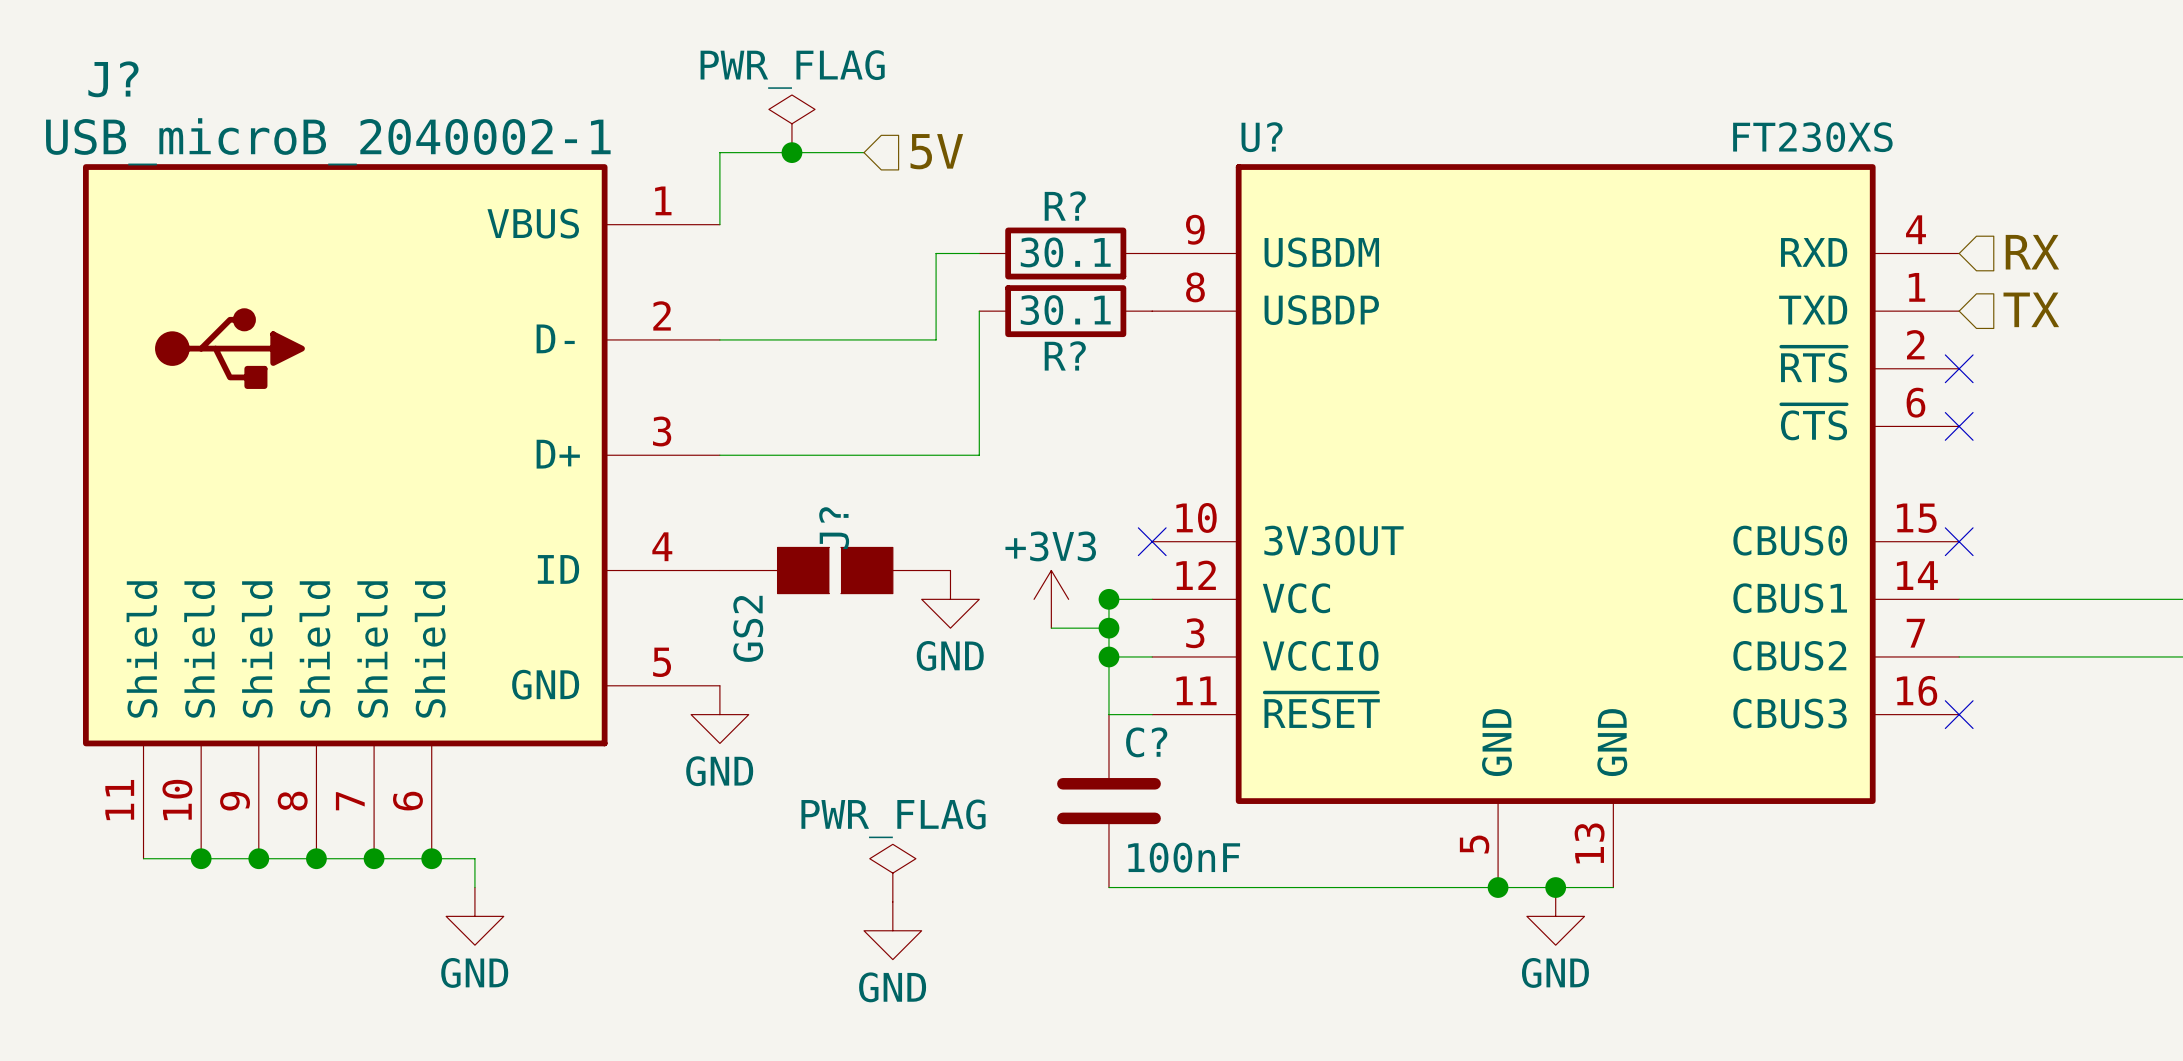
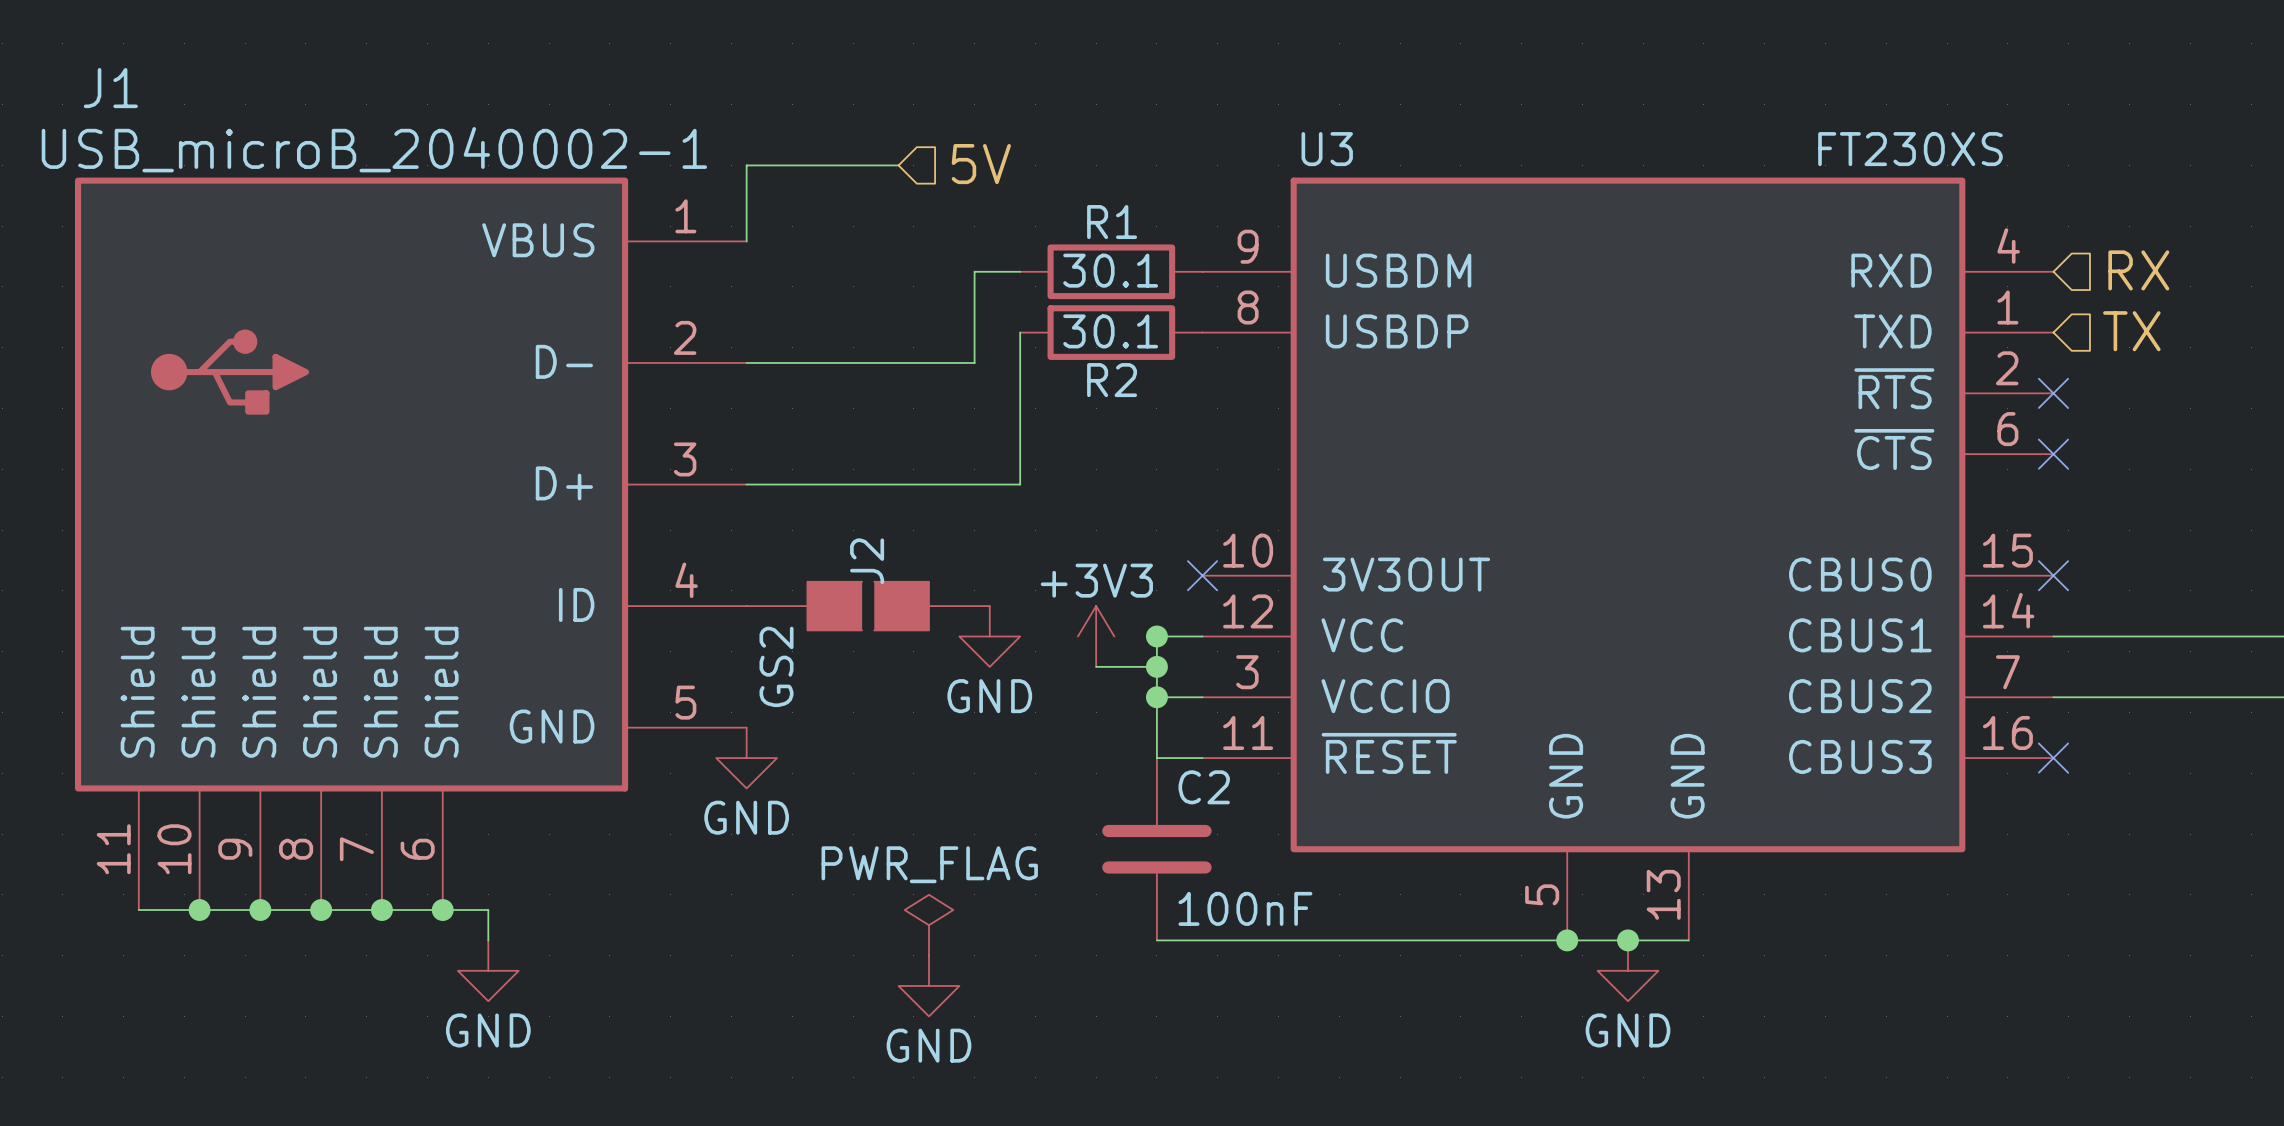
J? name: J? (113, 79) -> J1 (110, 88)
power symbol: PWR_FLAG (791, 123) -> none
U? name: U? (1262, 137) -> U3 (1327, 149)
junction: (791, 152) -> none
R? name: R? (1065, 206) -> R1 (1112, 222)
R? name: R? (1065, 355) -> R2 (1112, 380)
J? name: J? (834, 528) -> J2 (867, 561)
C? name: C? (1146, 742) -> C2 (1204, 787)

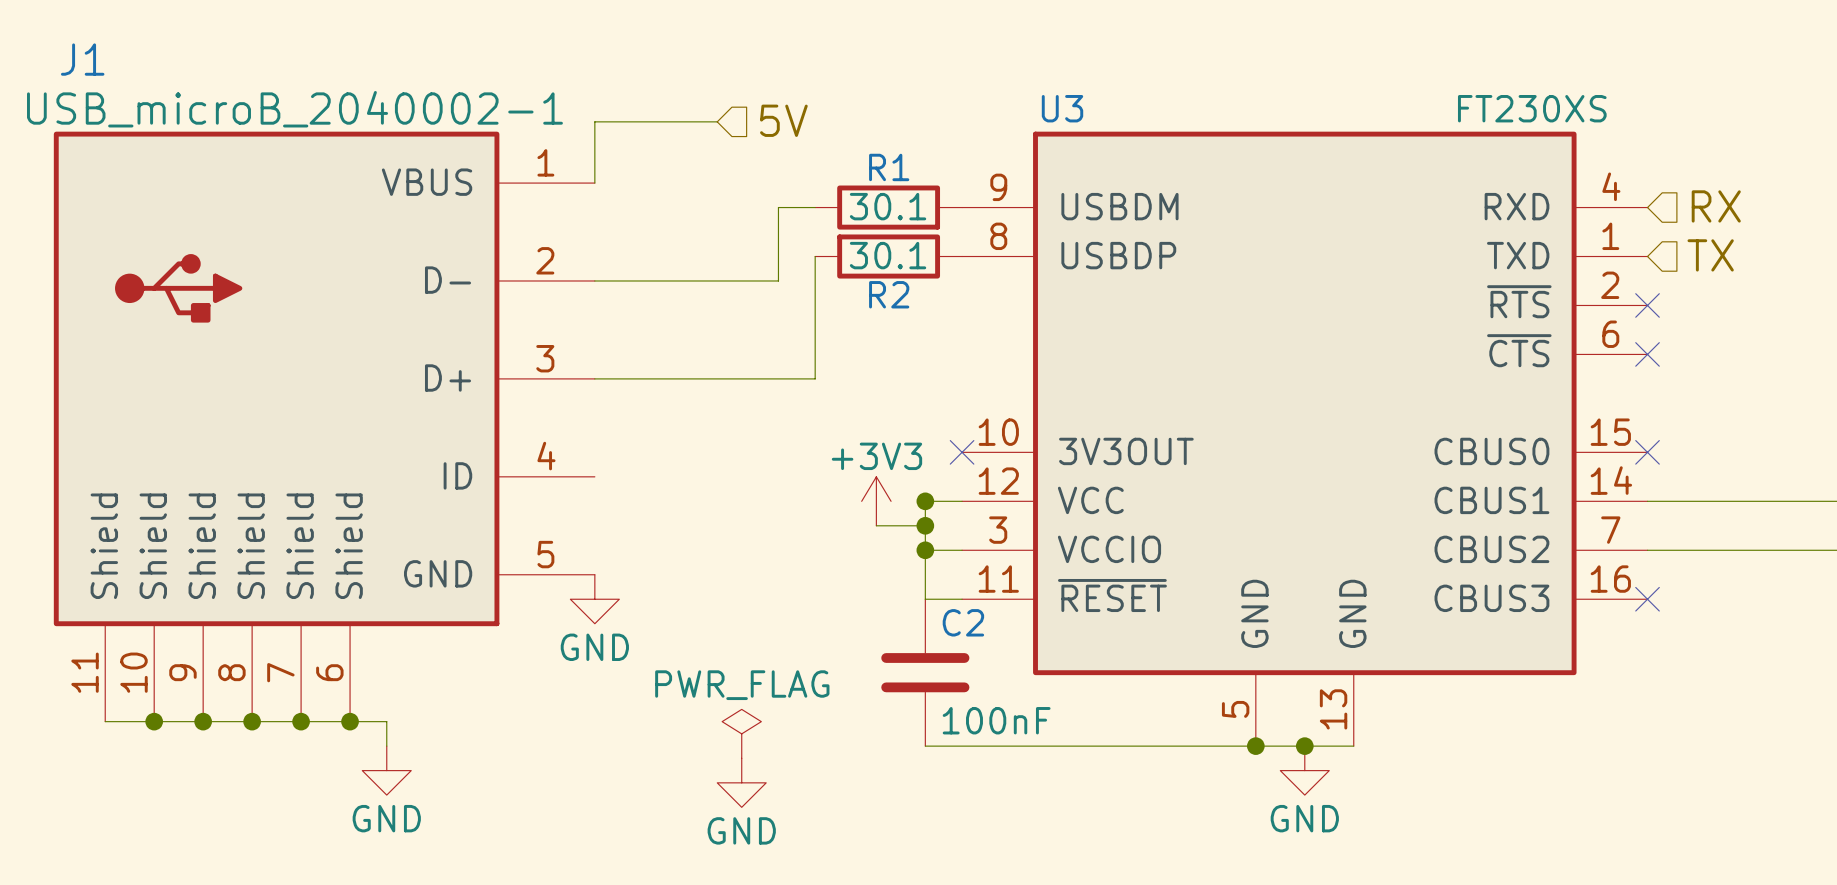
J2: GS2 (868, 606) -> none
power symbol: GND (989, 636) -> none

